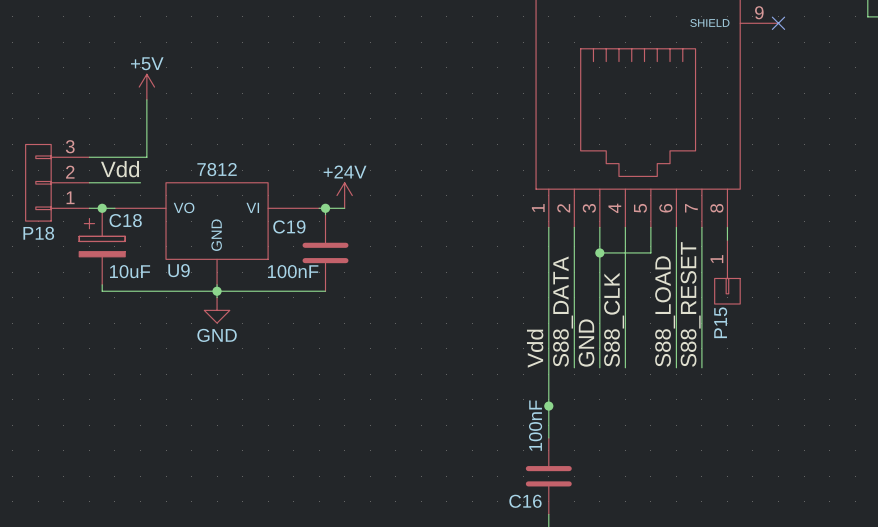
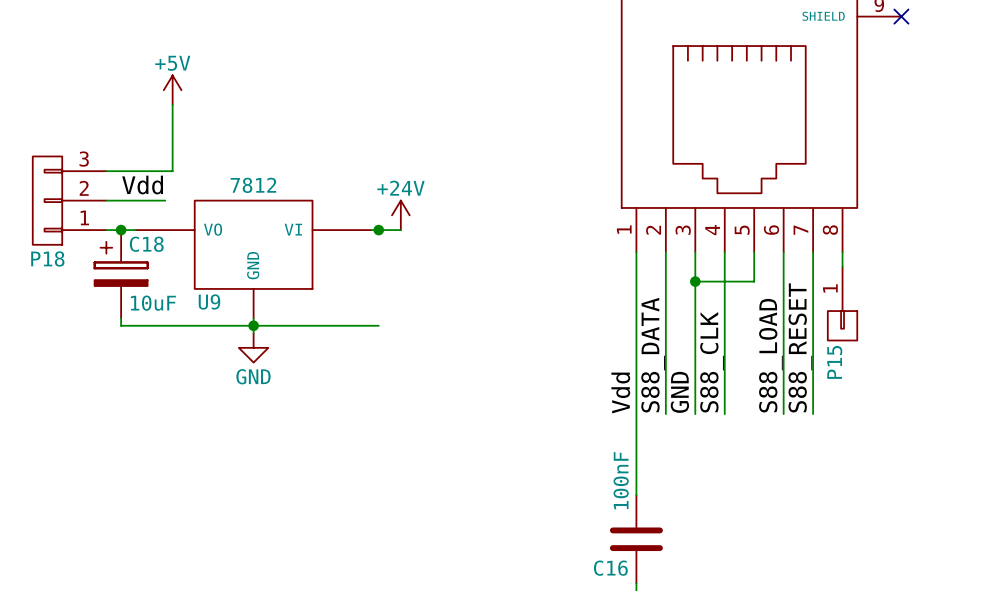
C19: 100nF (325, 252) -> none
junction: (548, 406) -> none

